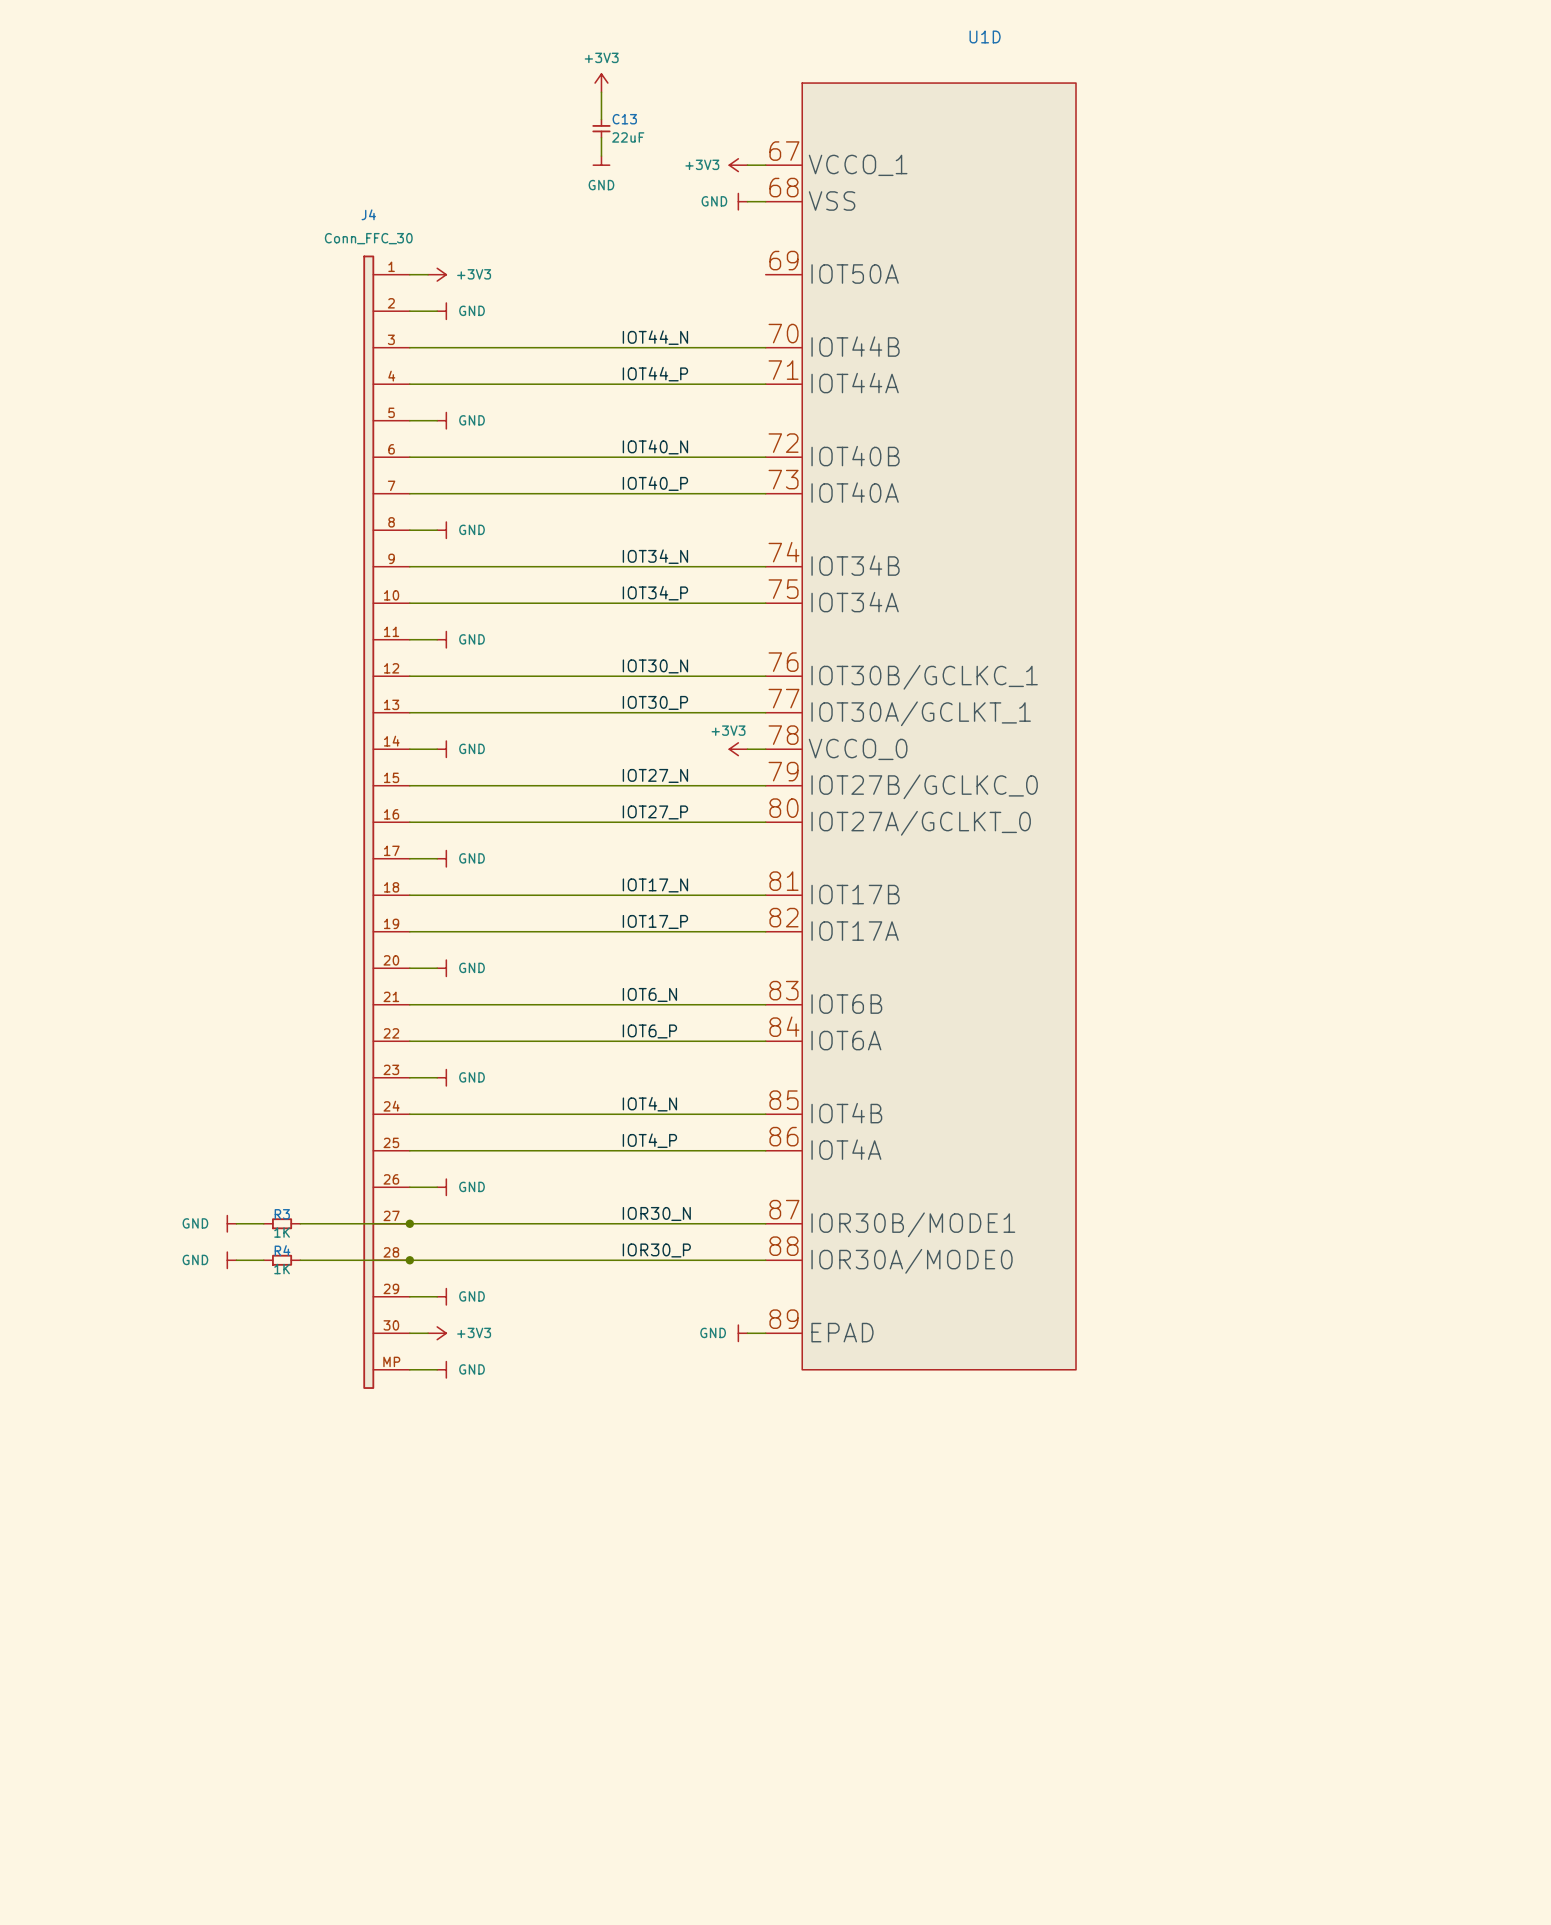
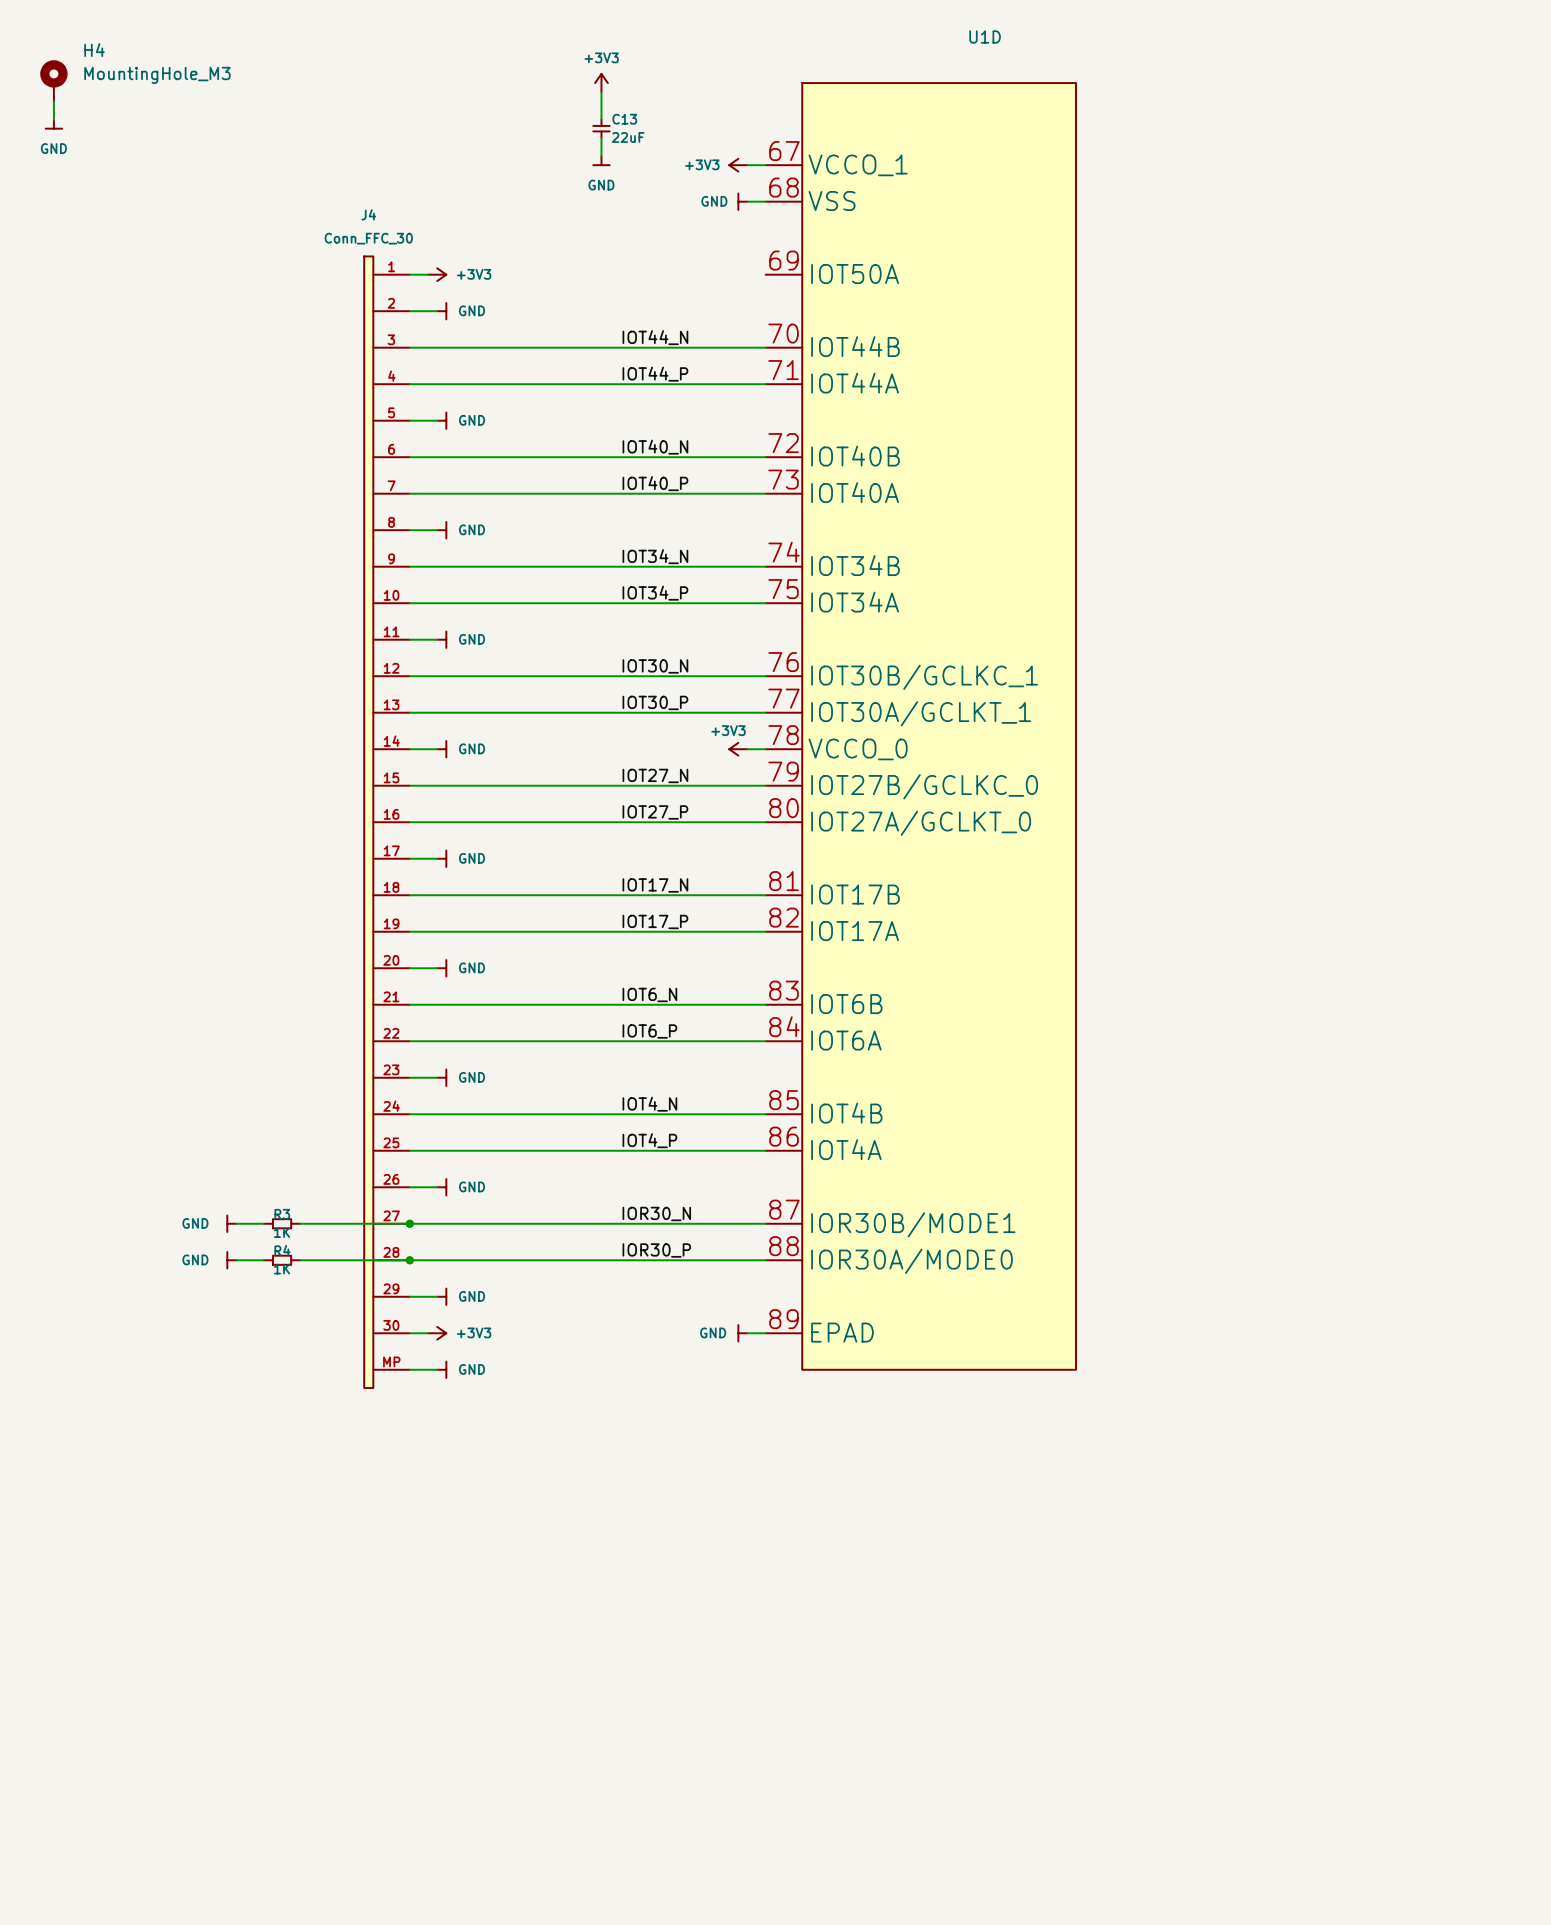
H4: none -> MountingHole_M3 (53, 80)
wire: none -> (53, 101) (53, 119)
power symbol: none -> GND (53, 124)

